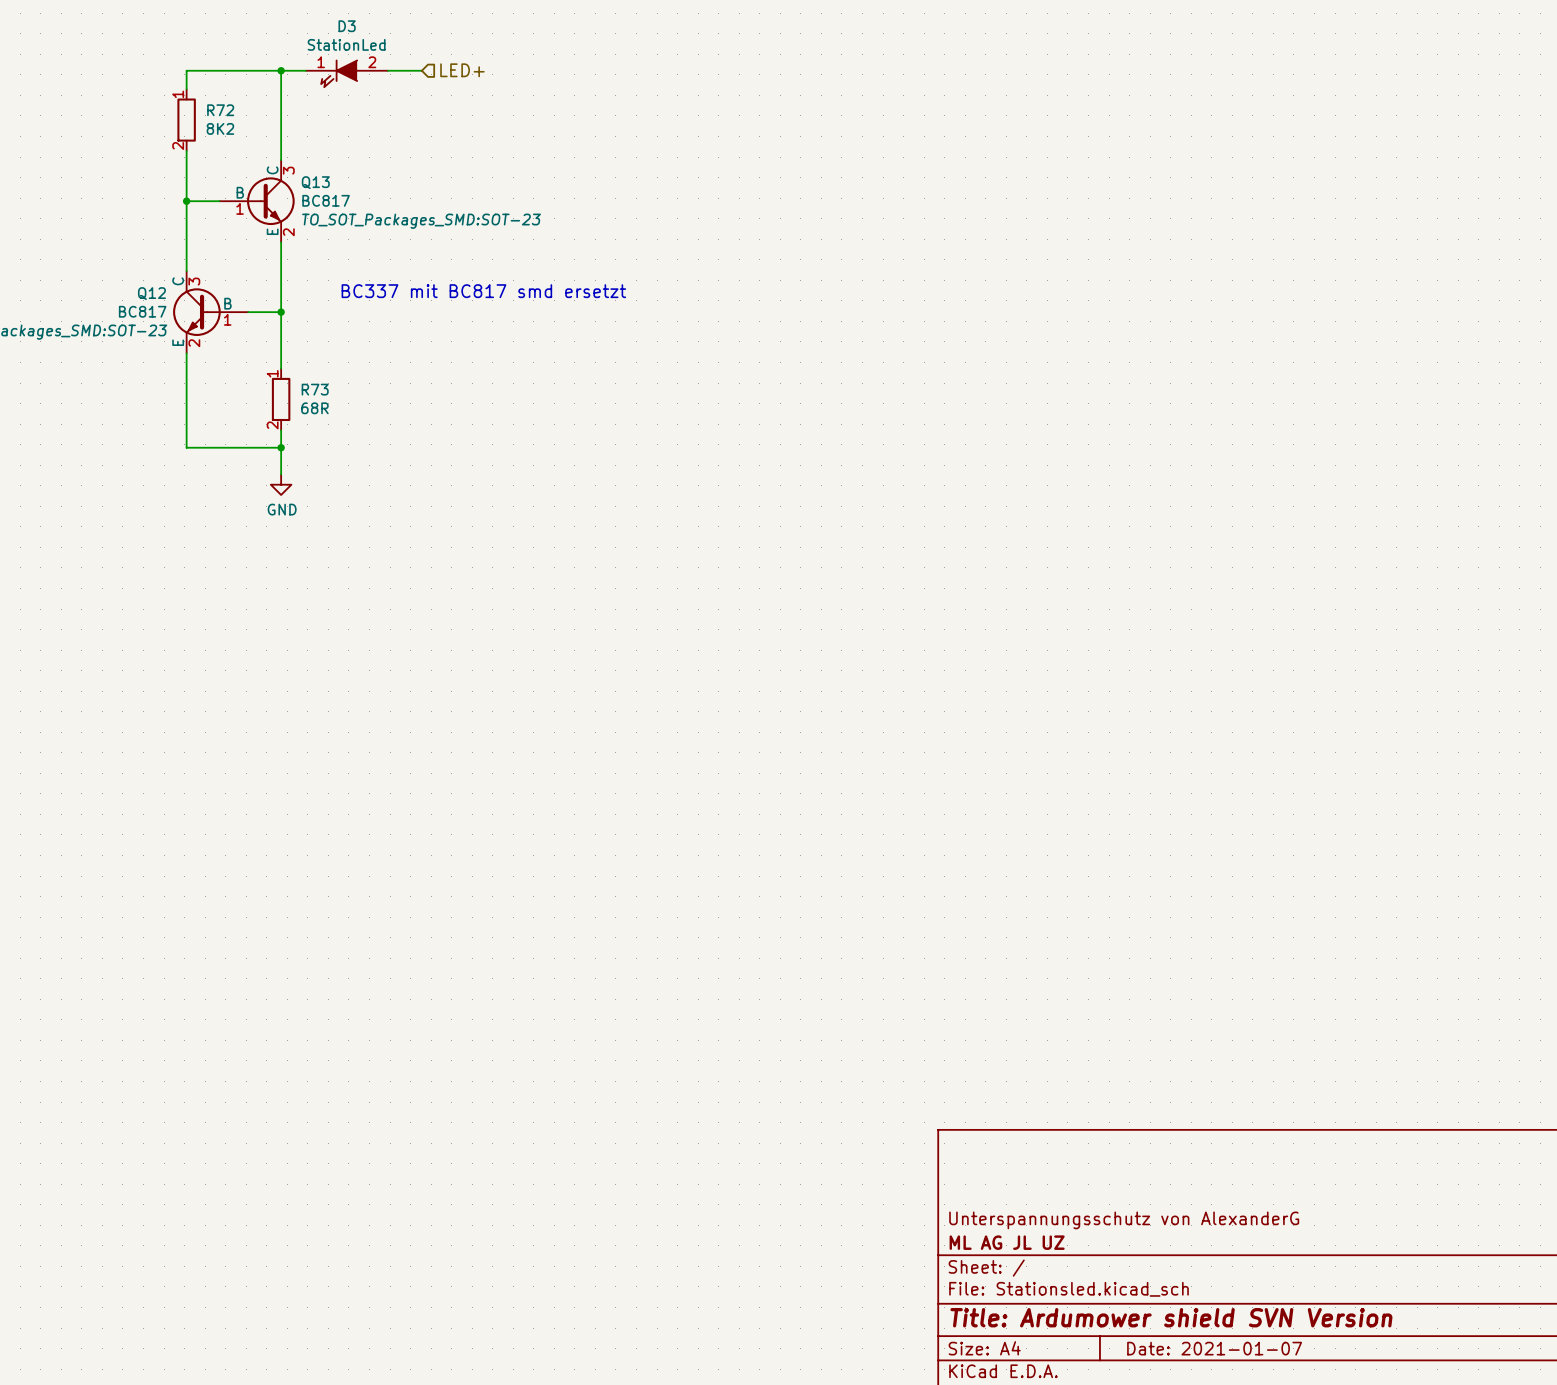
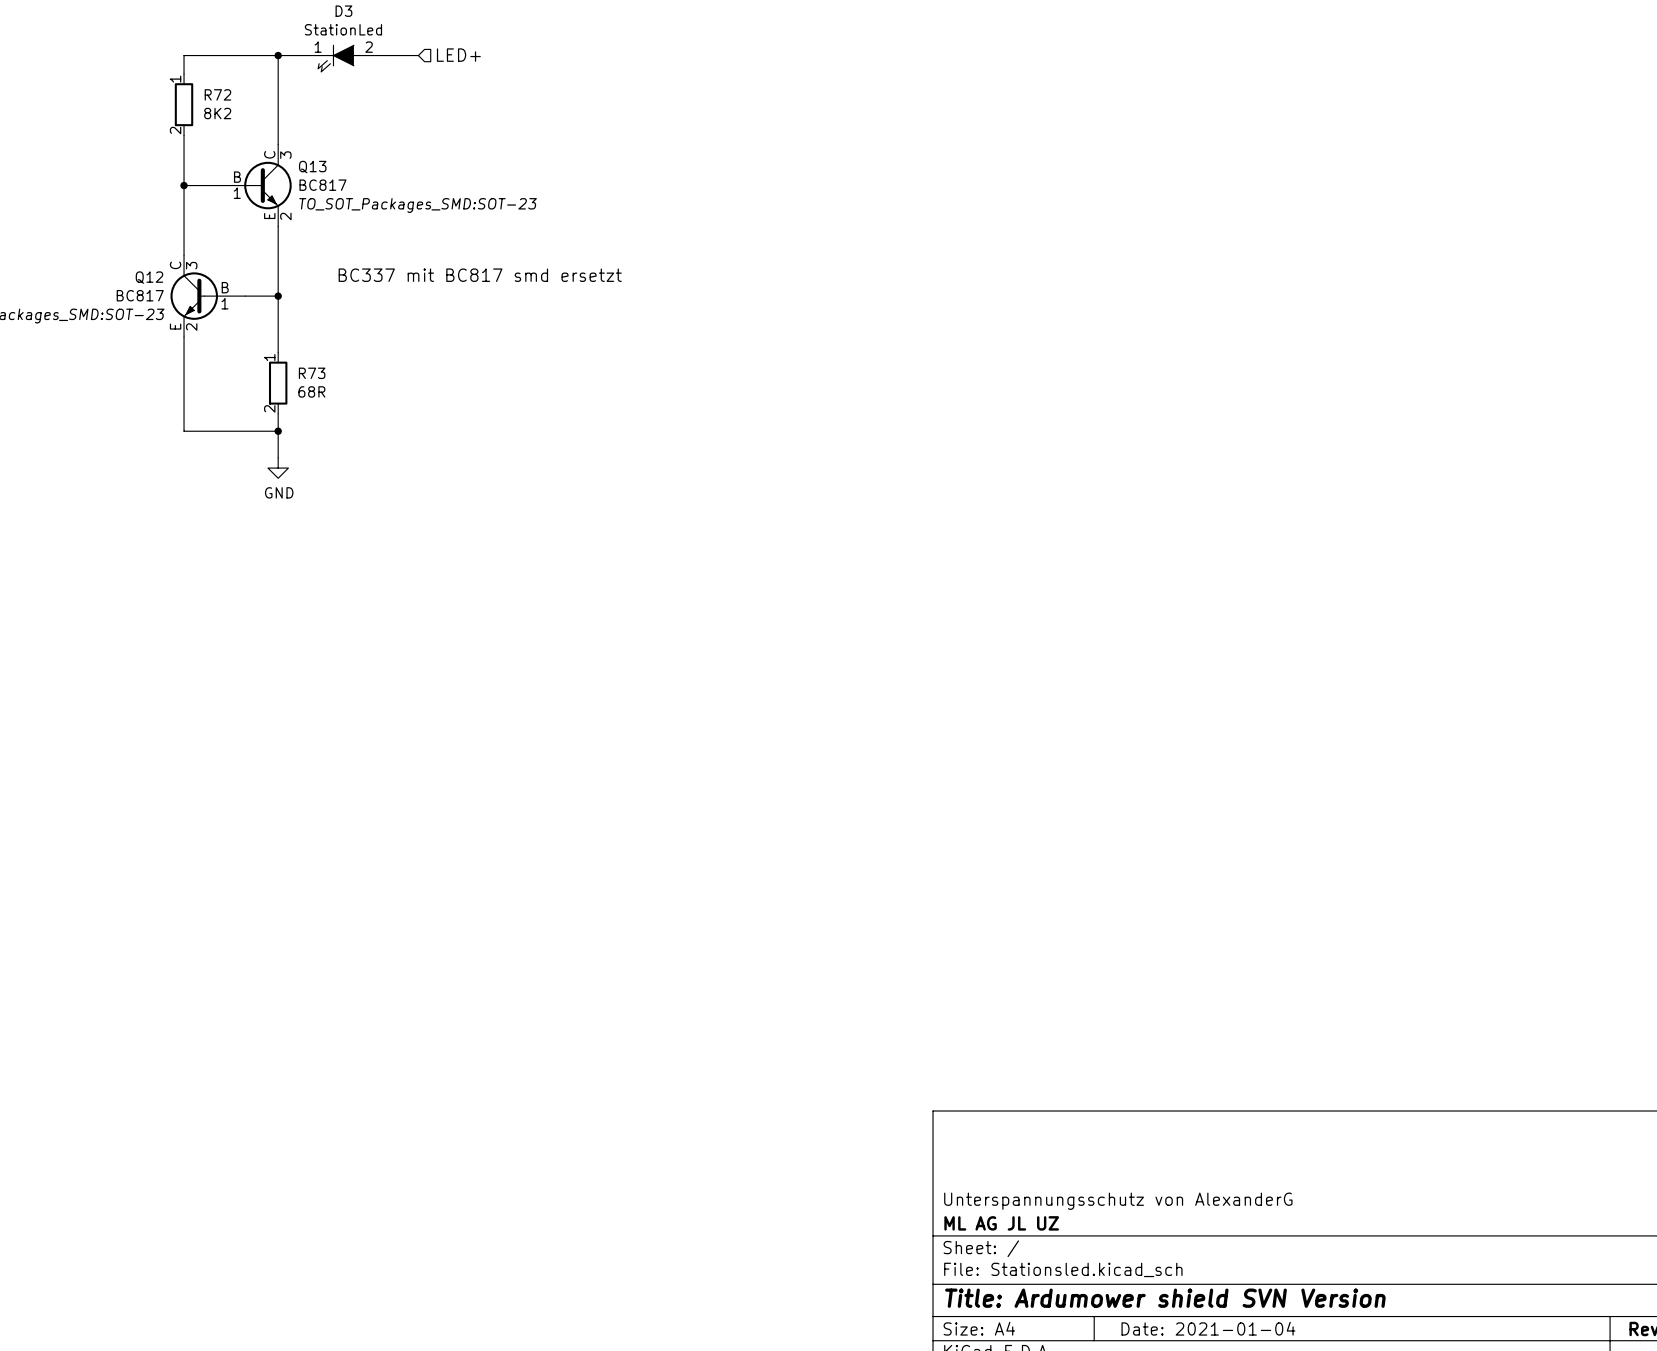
title block: Date: 2021-01-07 (1214, 1348) -> Date: 2021-01-04 (1208, 1328)

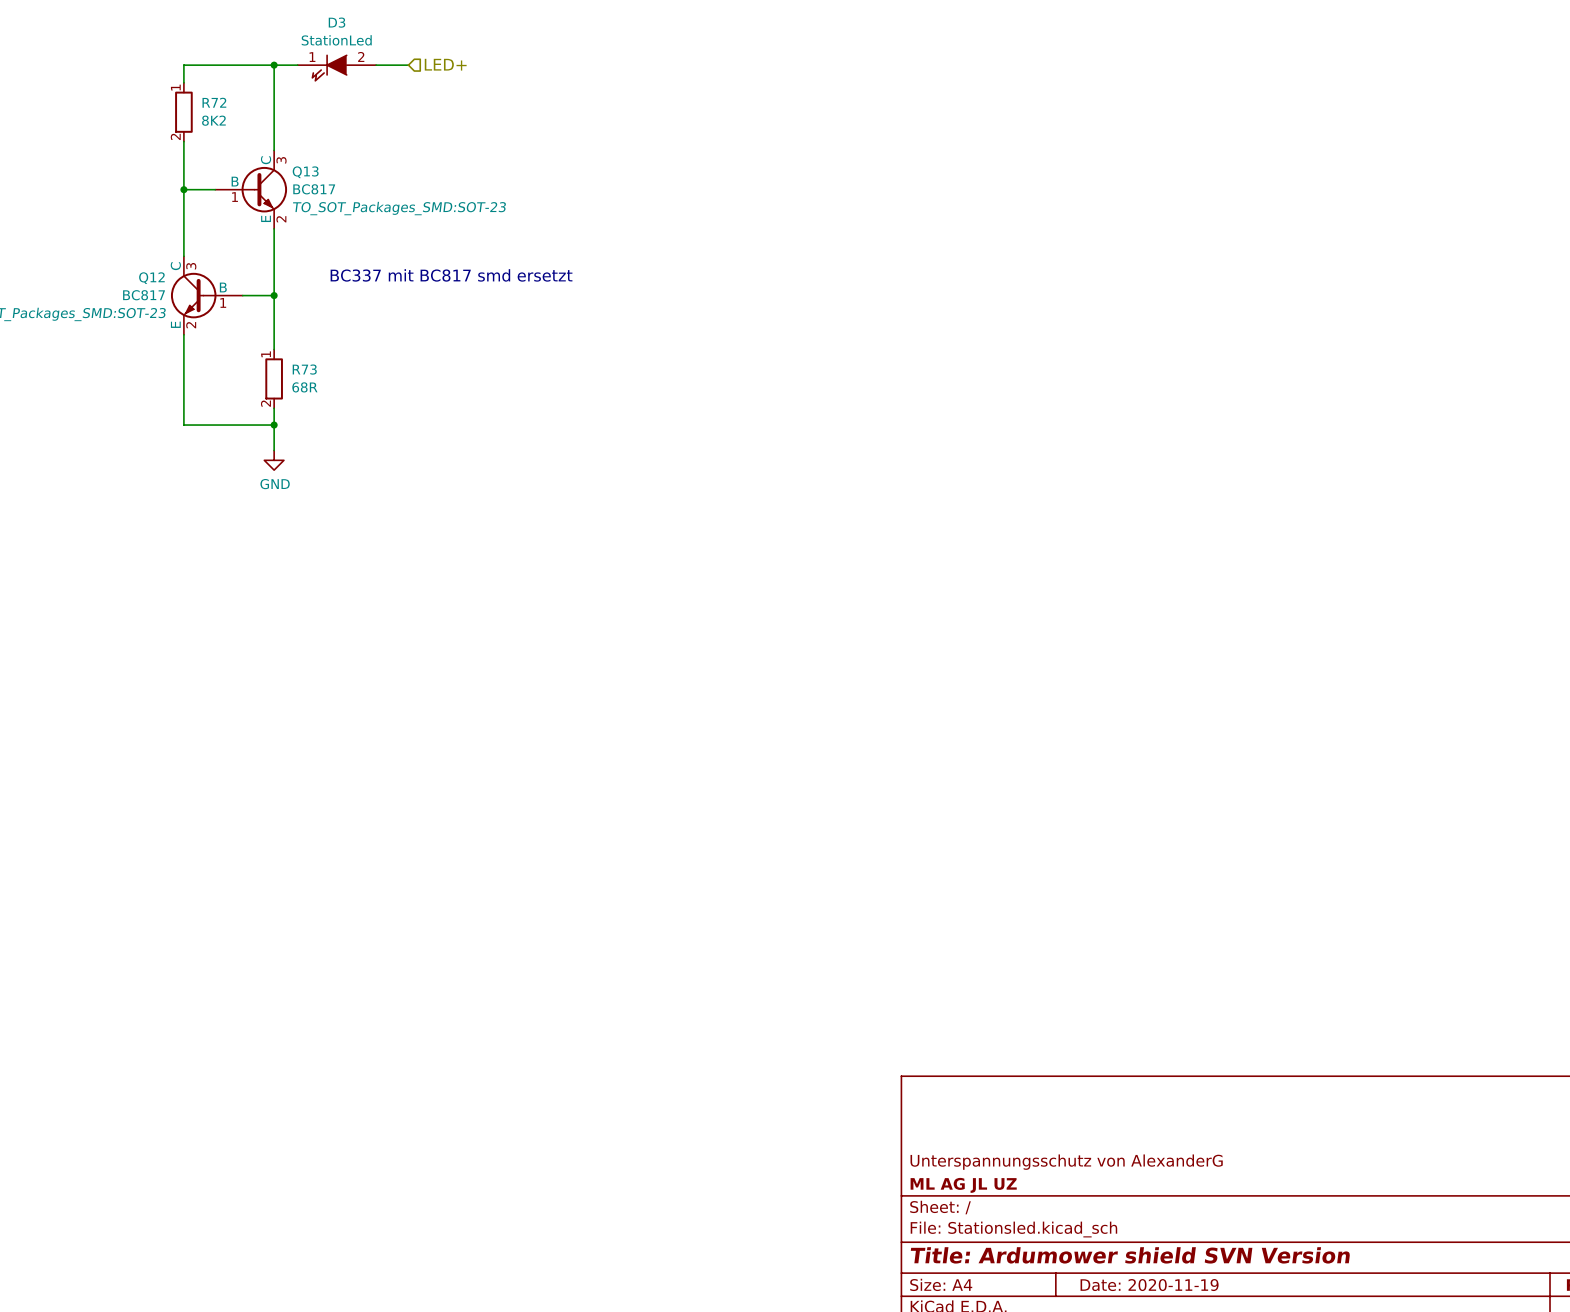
title block: Date: 2021-01-04 (1208, 1328) -> Date: 2020-11-19 (1149, 1285)

